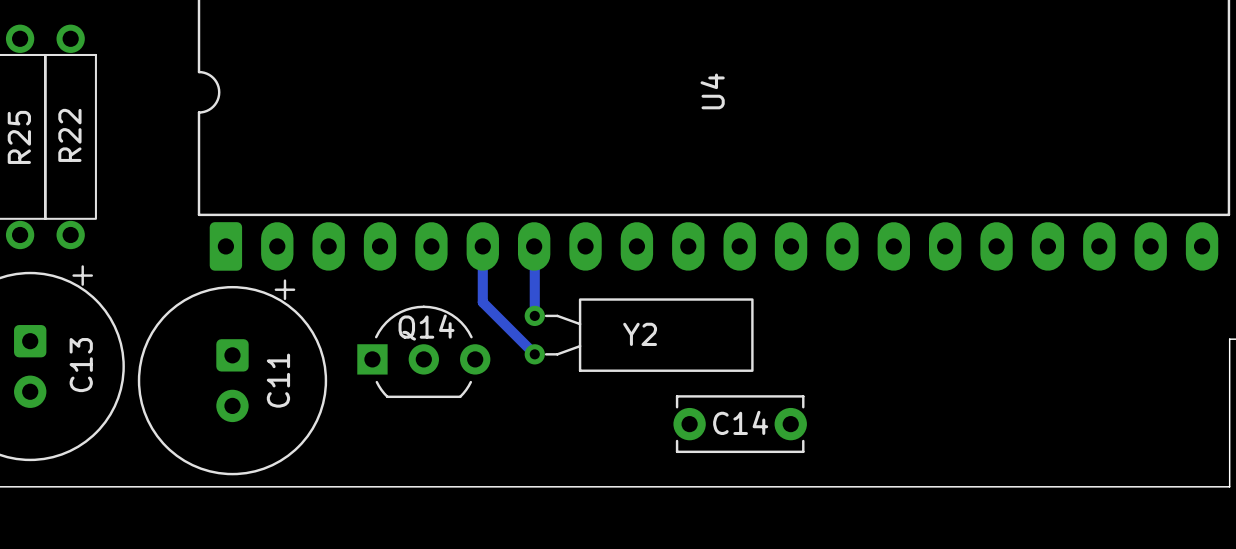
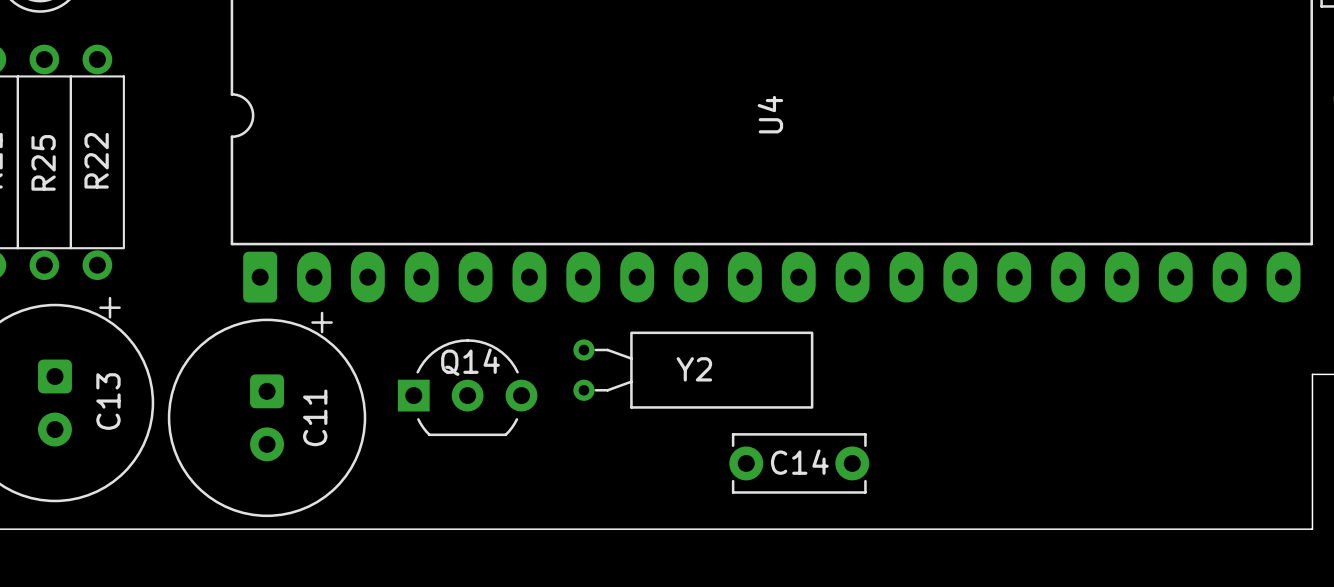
bottom track: (482, 246) (482, 302) (534, 354) -> none
bottom track: (534, 246) (534, 315) -> none

